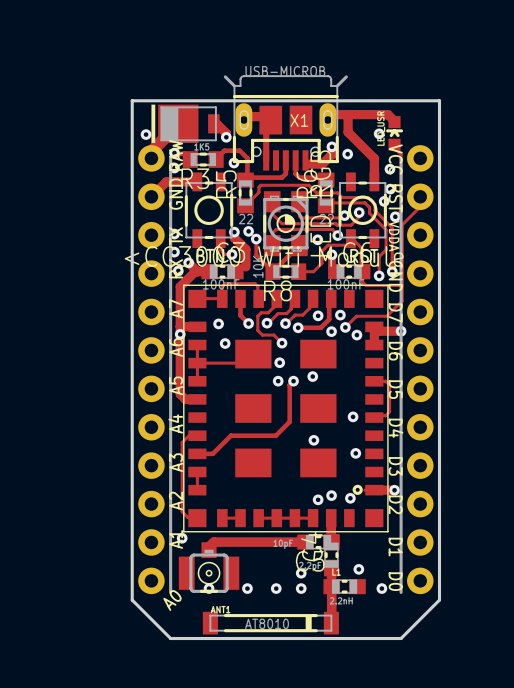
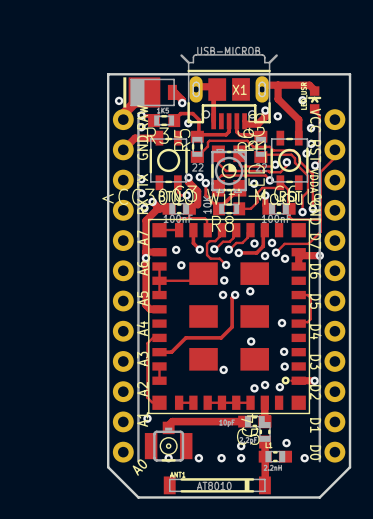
via: none -> (284, 366)
via: none -> (223, 369)

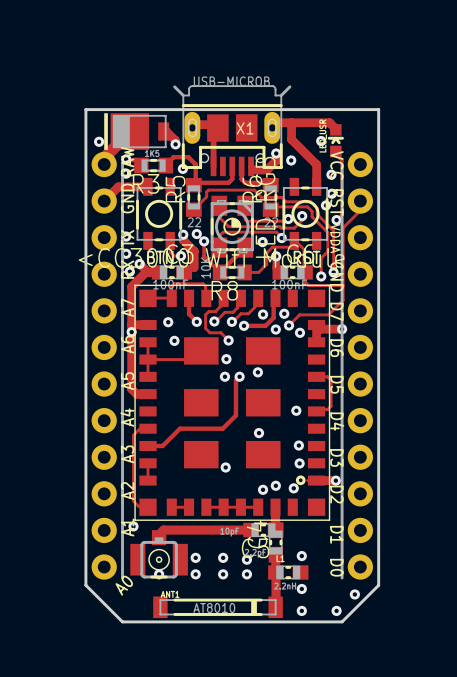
via: none -> (195, 557)
via: none -> (223, 557)
via: (304, 458) -> none
via: none -> (301, 588)
via: none -> (354, 594)
via: none -> (301, 610)
via: none -> (336, 610)

